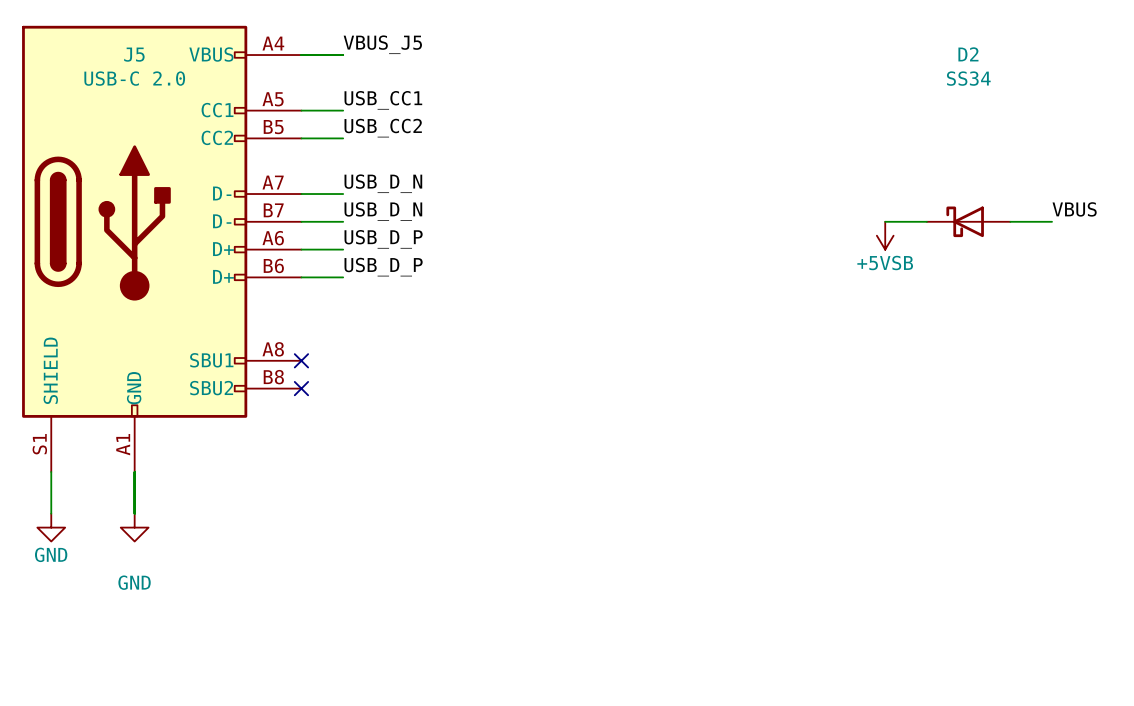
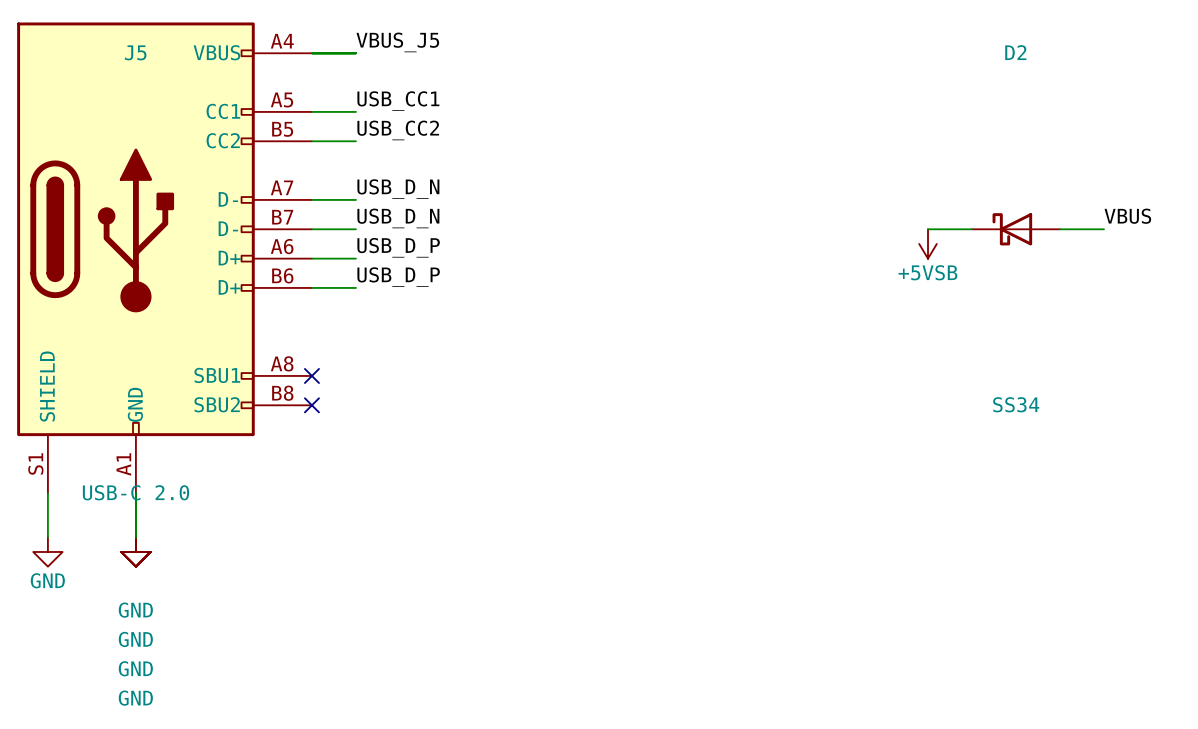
J5 value position: USB-C 2.0 (134, 78) -> USB-C 2.0 (136, 492)
D2 value position: SS34 (968, 78) -> SS34 (1016, 404)
power symbol: none -> GND (135, 551)
power symbol: none -> GND (135, 551)
power symbol: none -> GND (135, 551)

